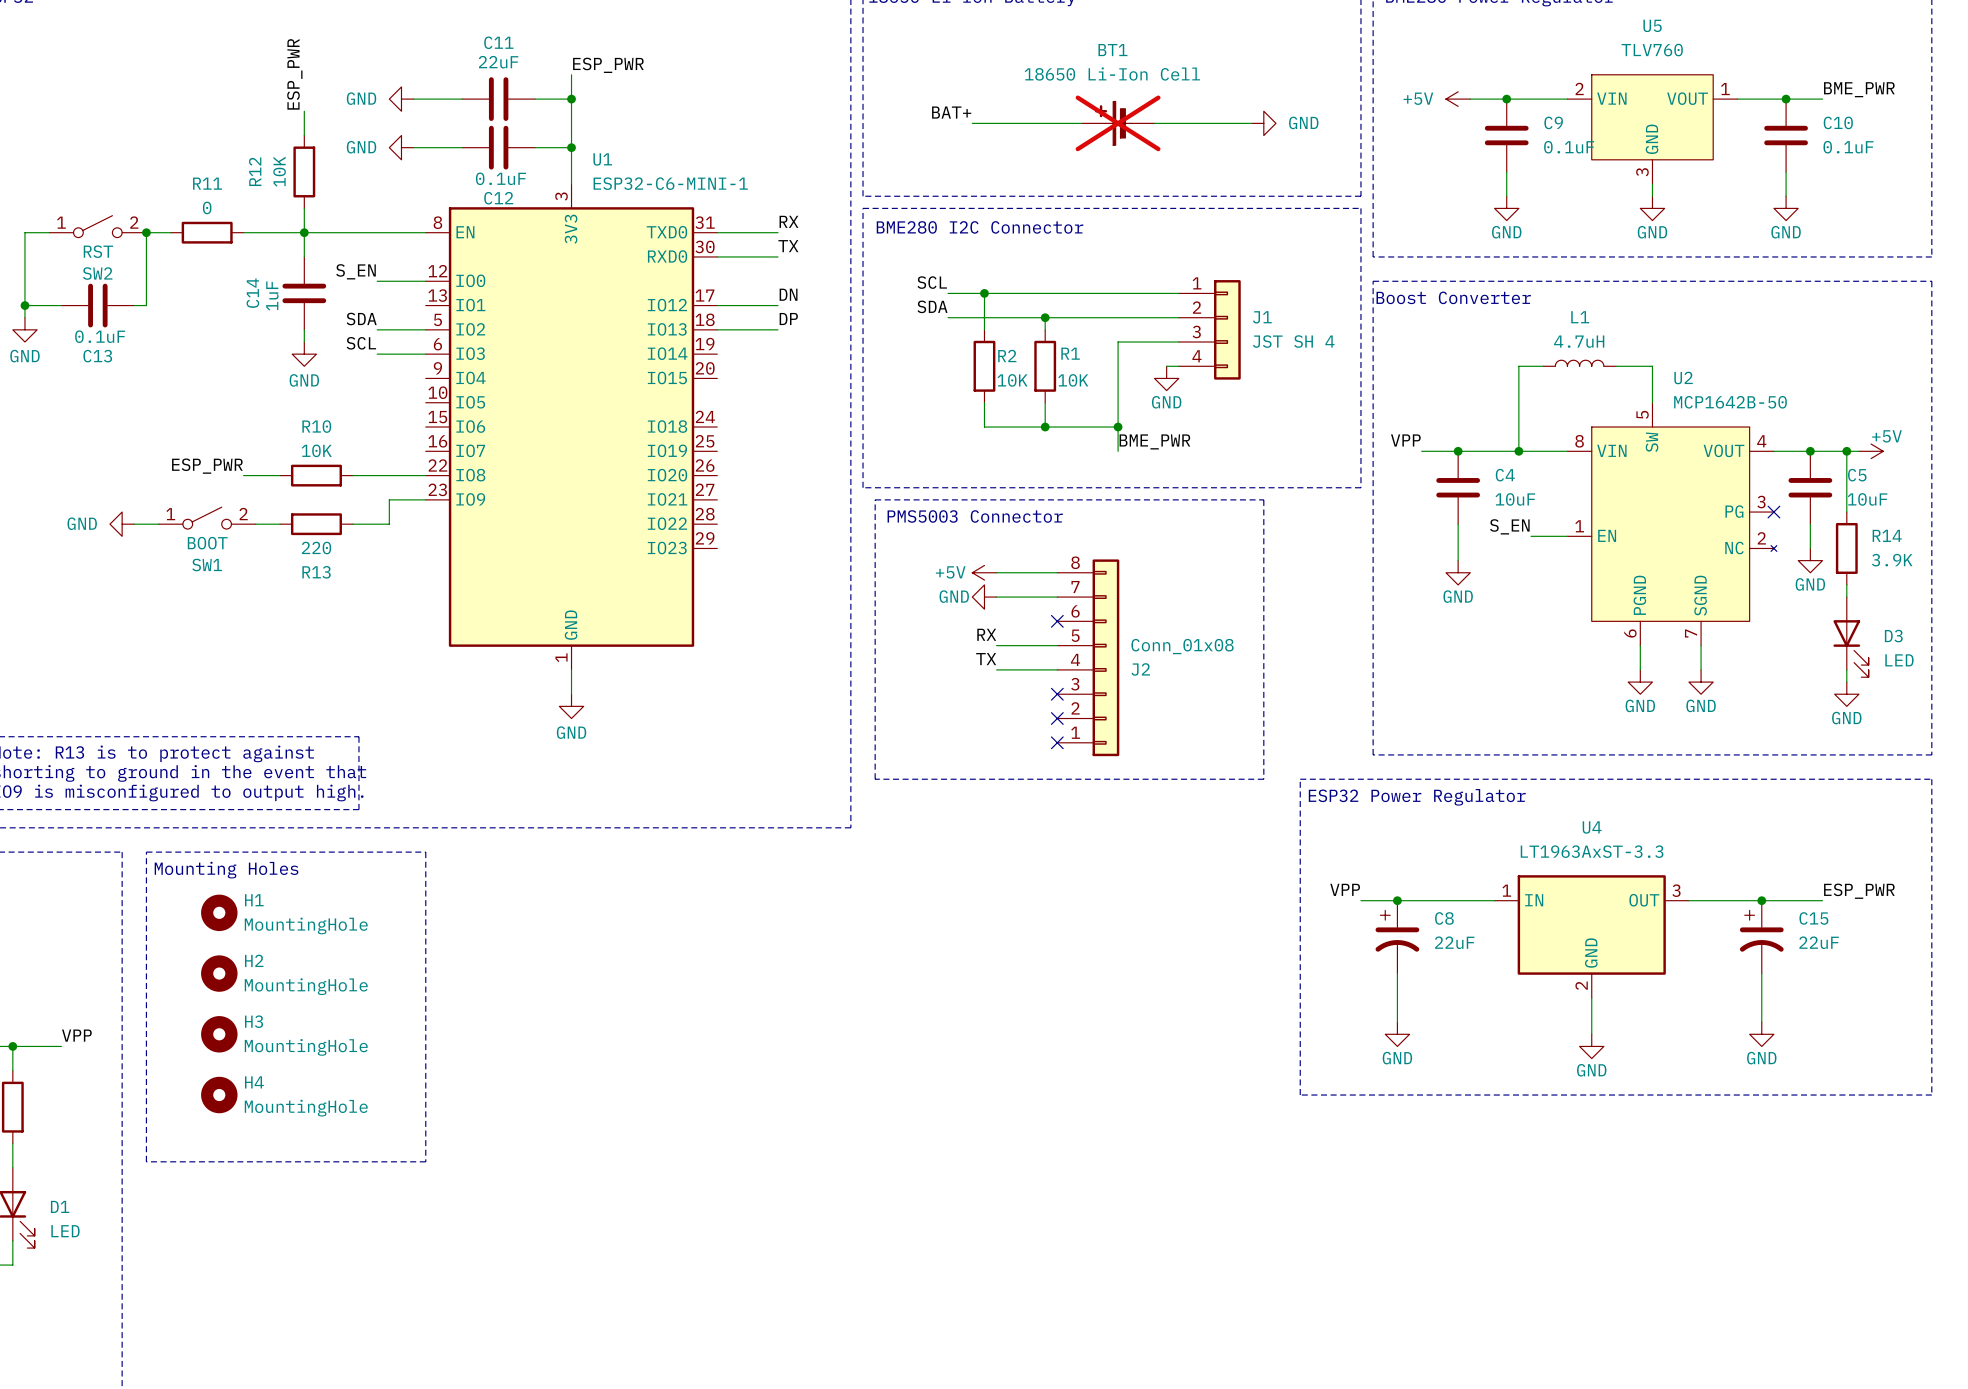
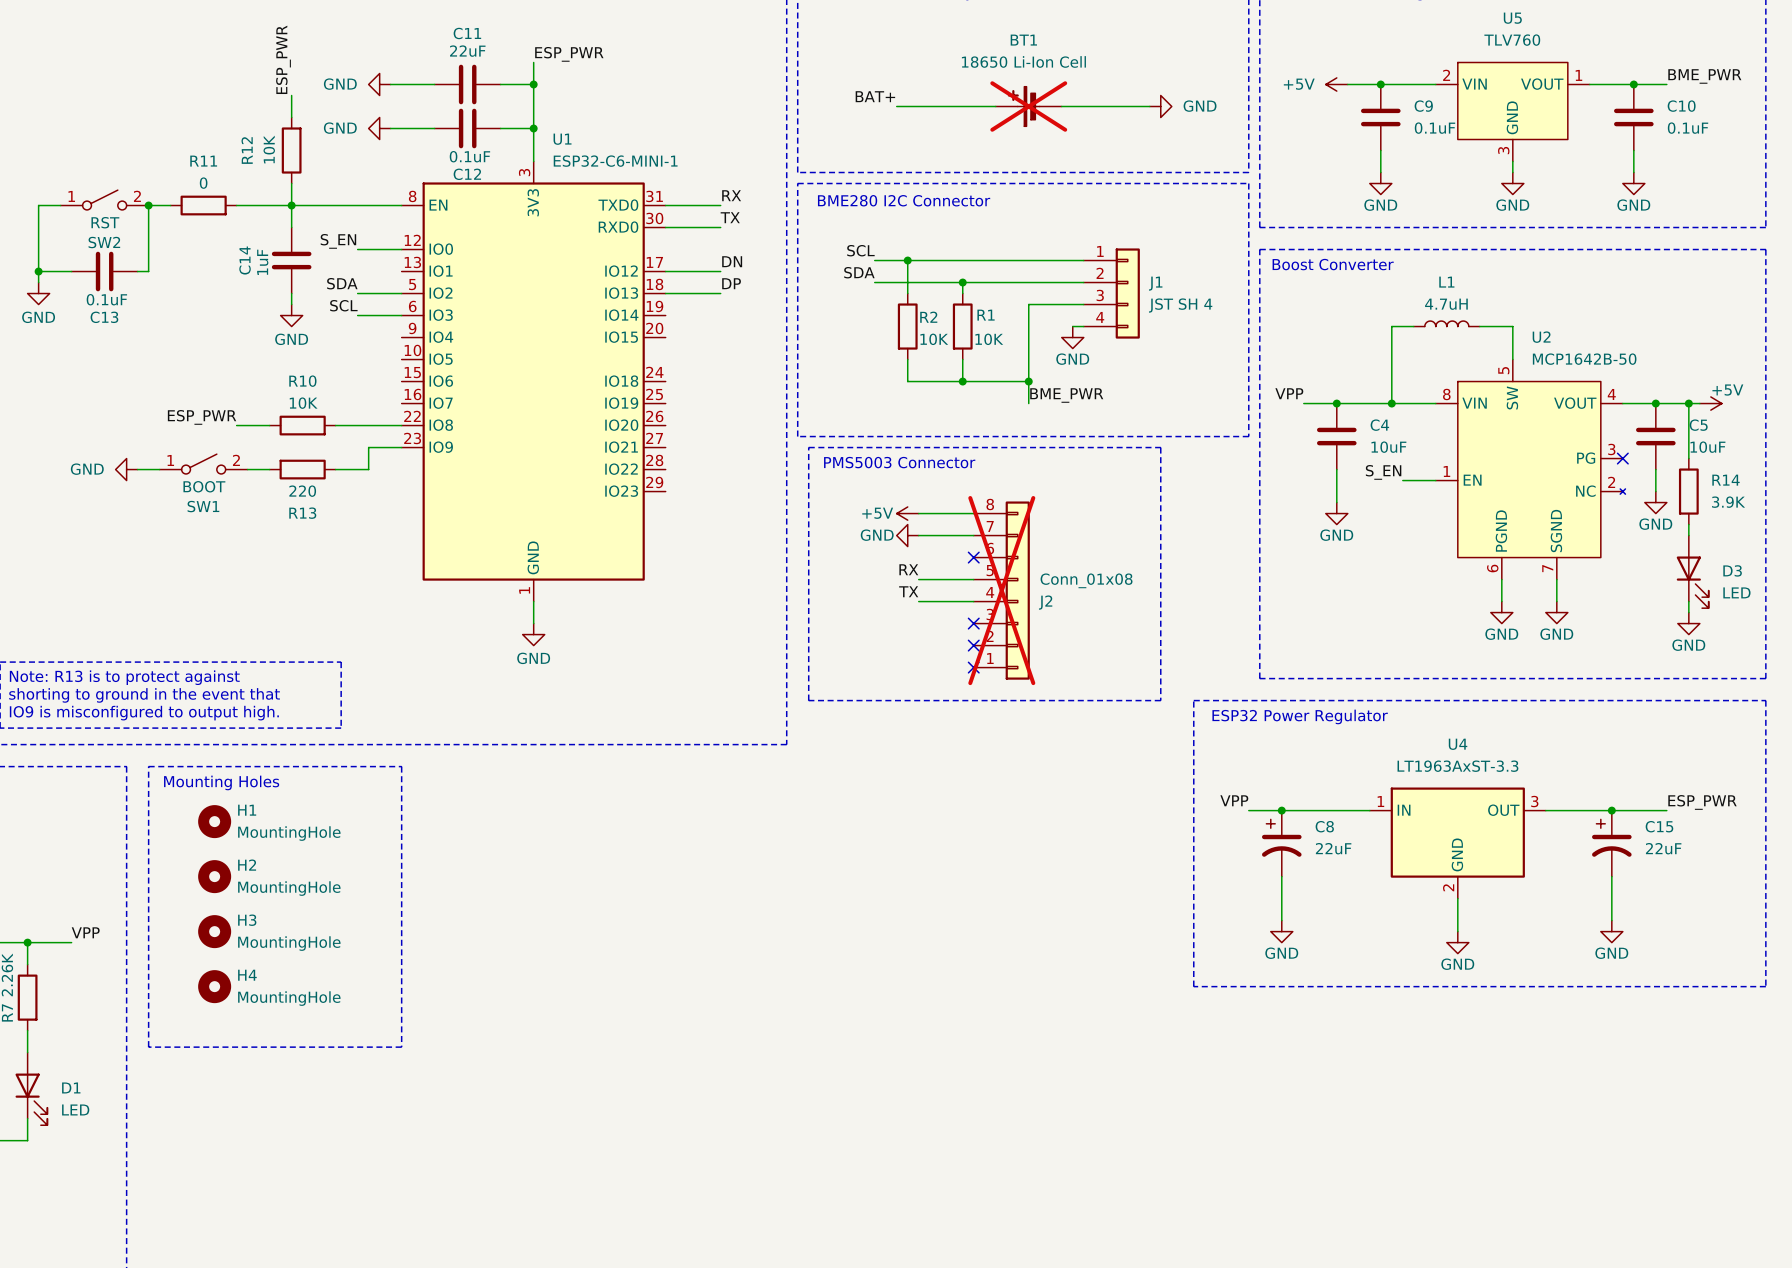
J2 do-not-place cross: none -> (1001, 590)

